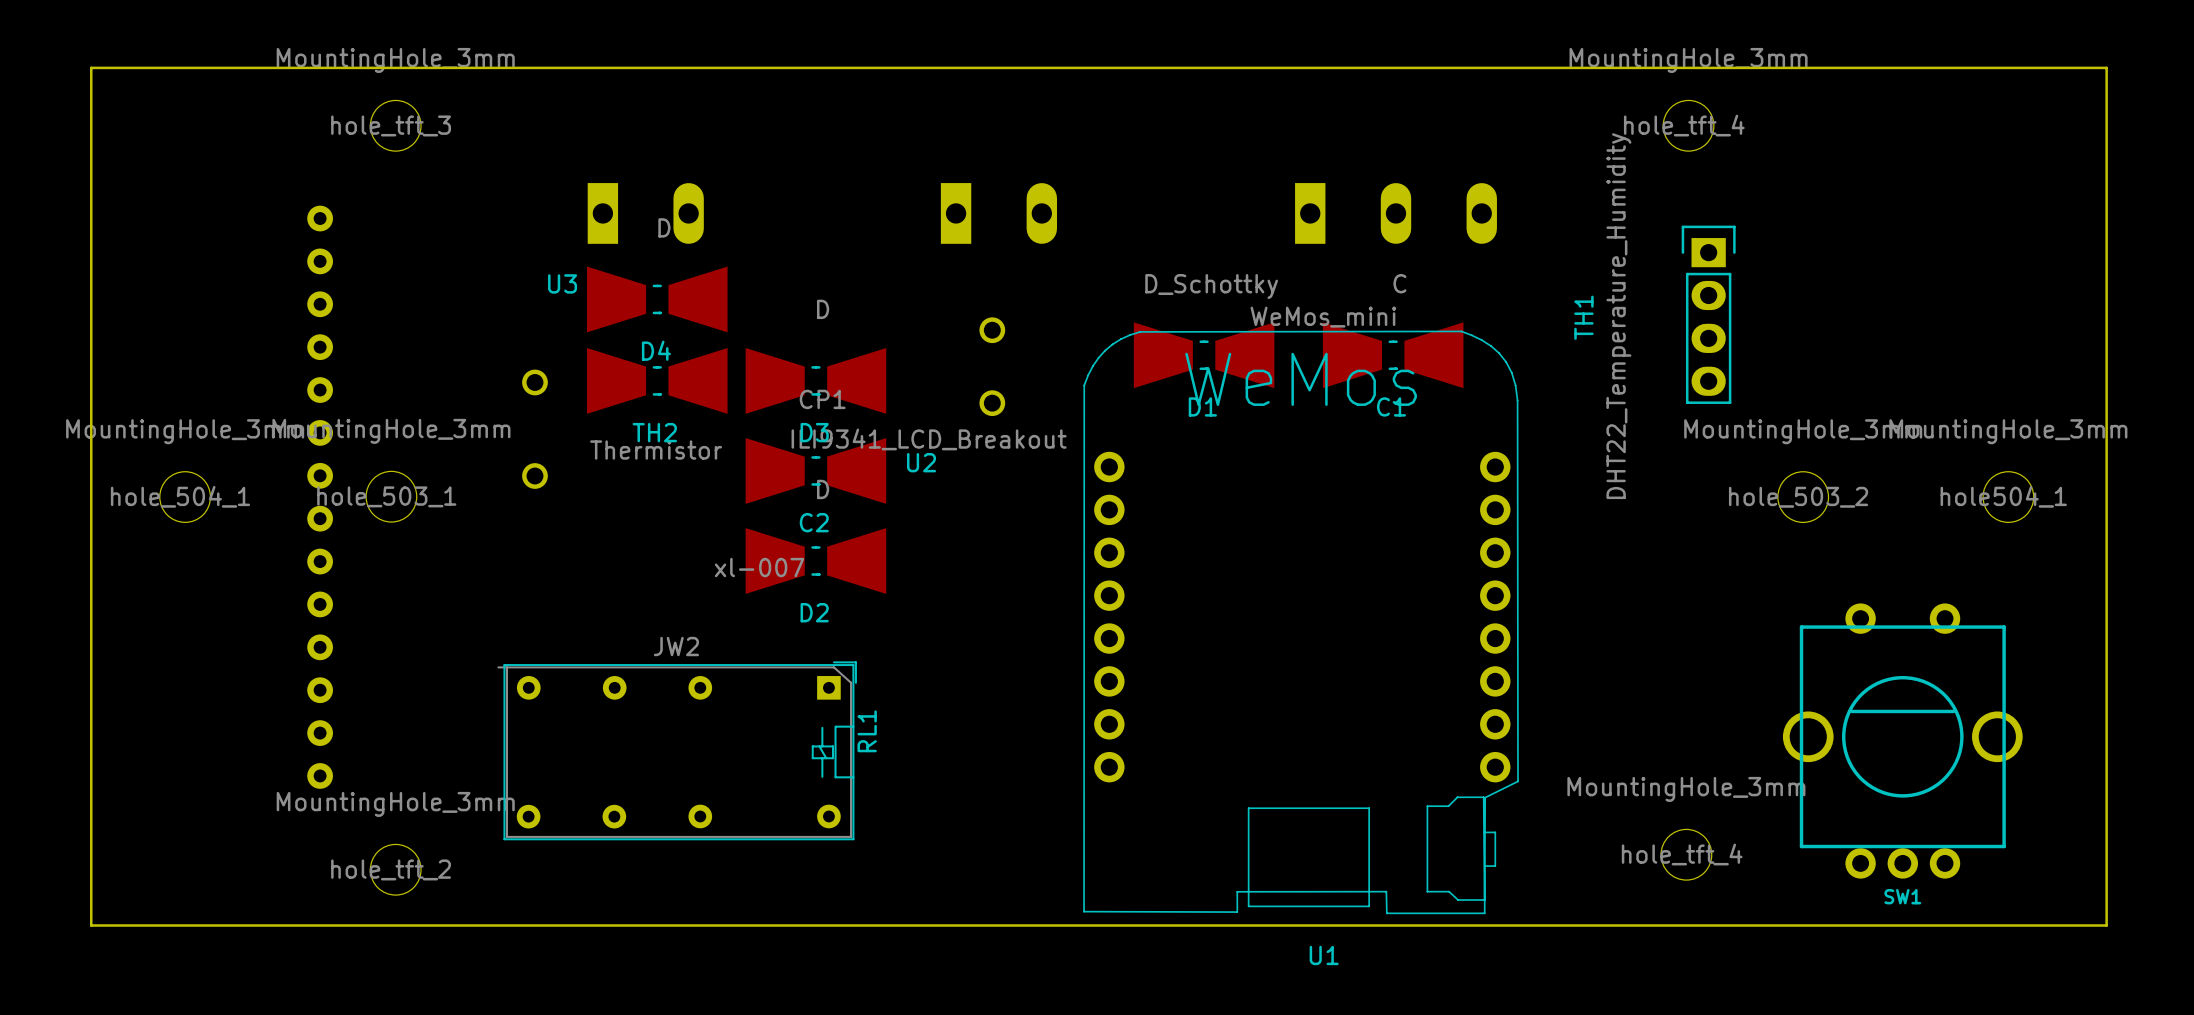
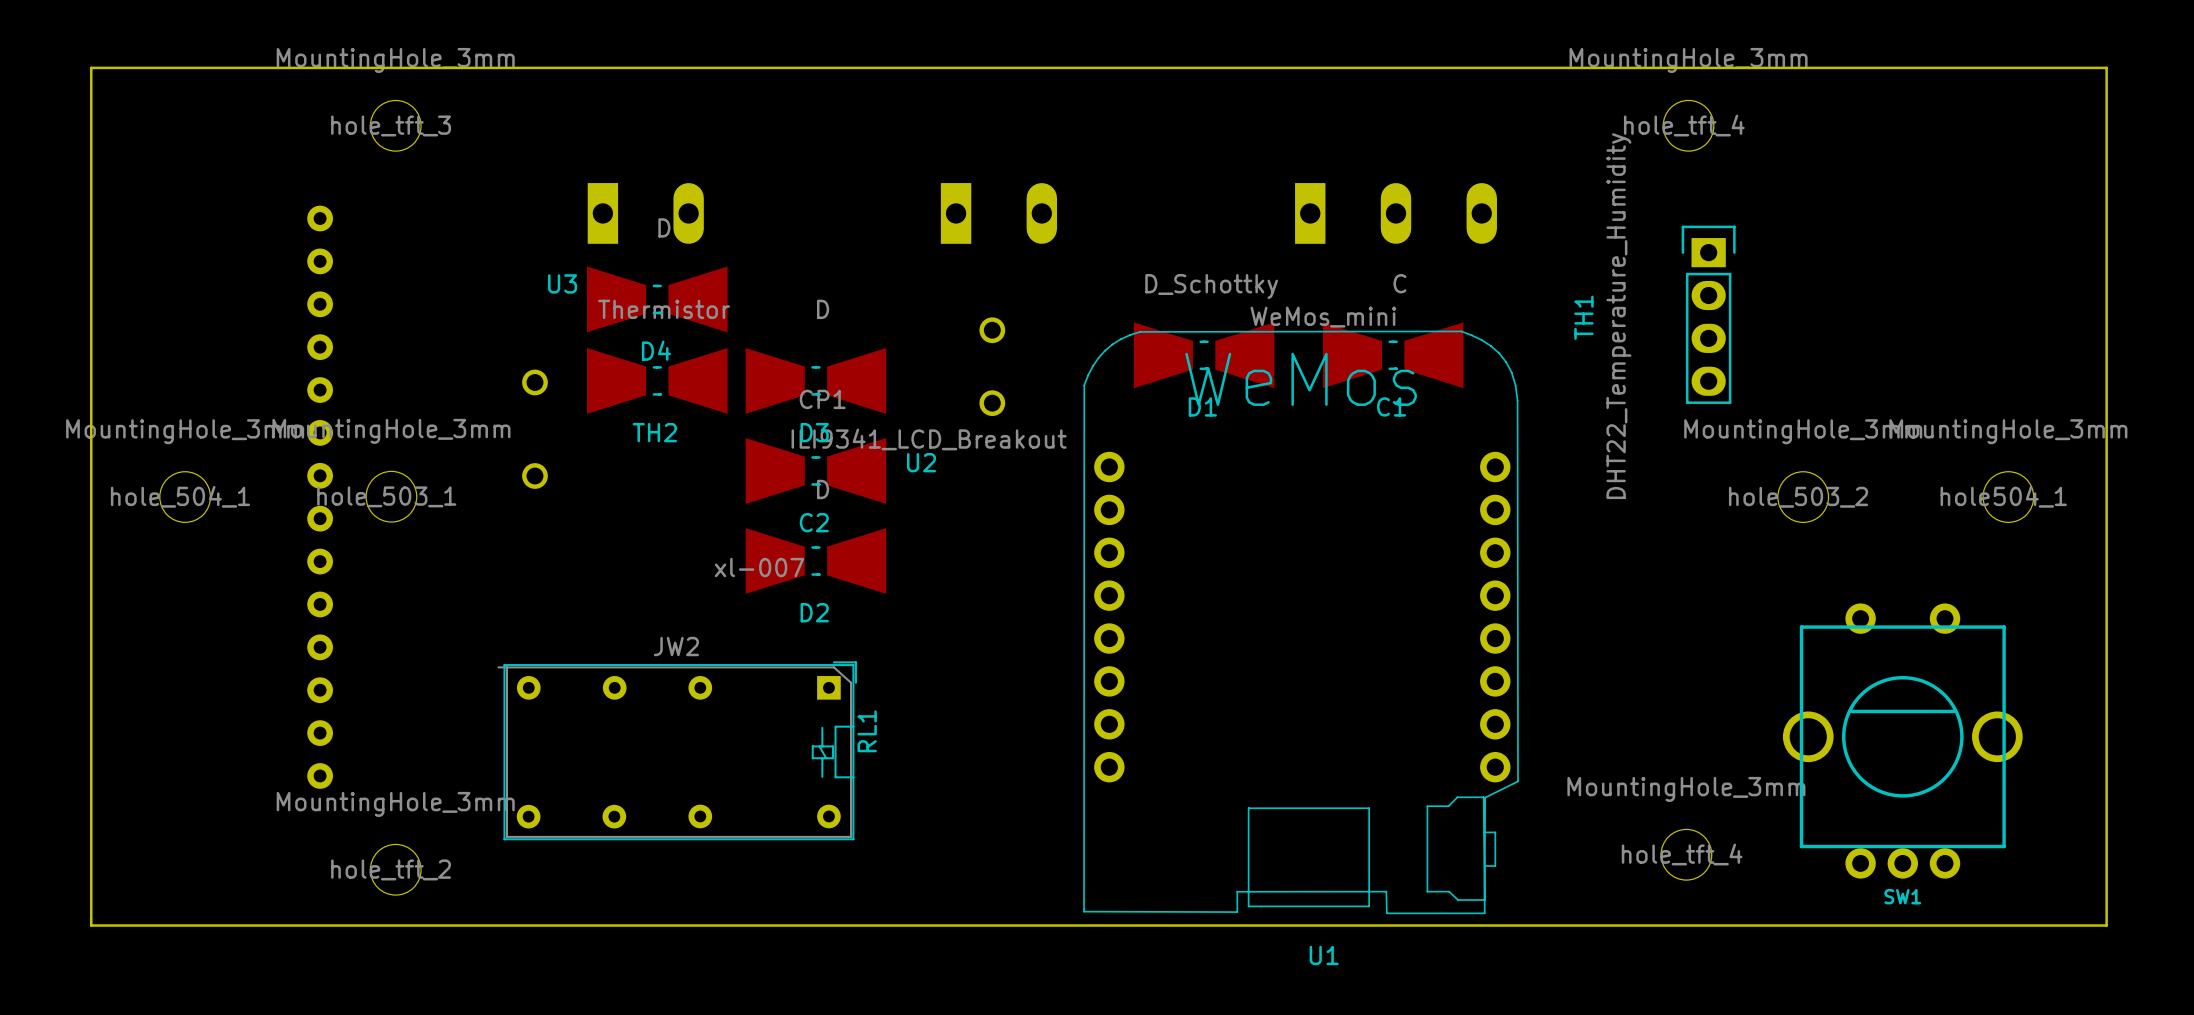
TH2 value position: Thermistor (656, 450) -> Thermistor (664, 309)

